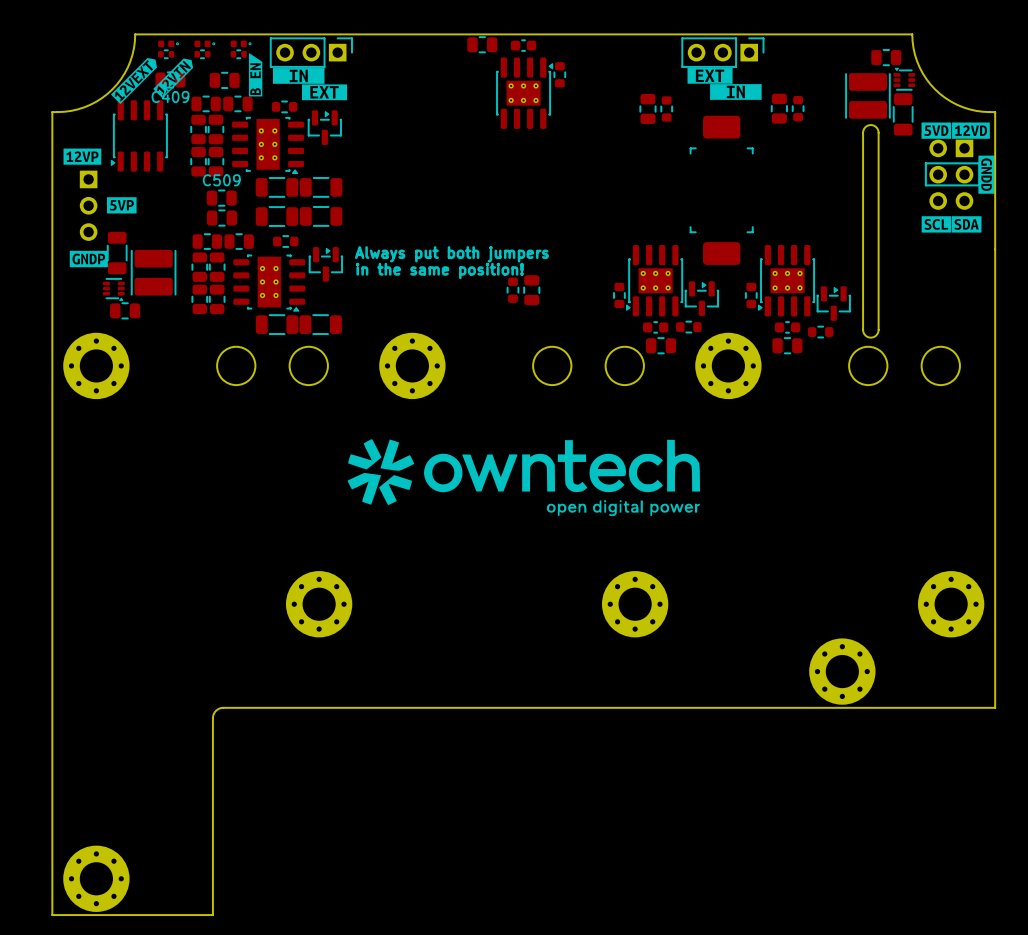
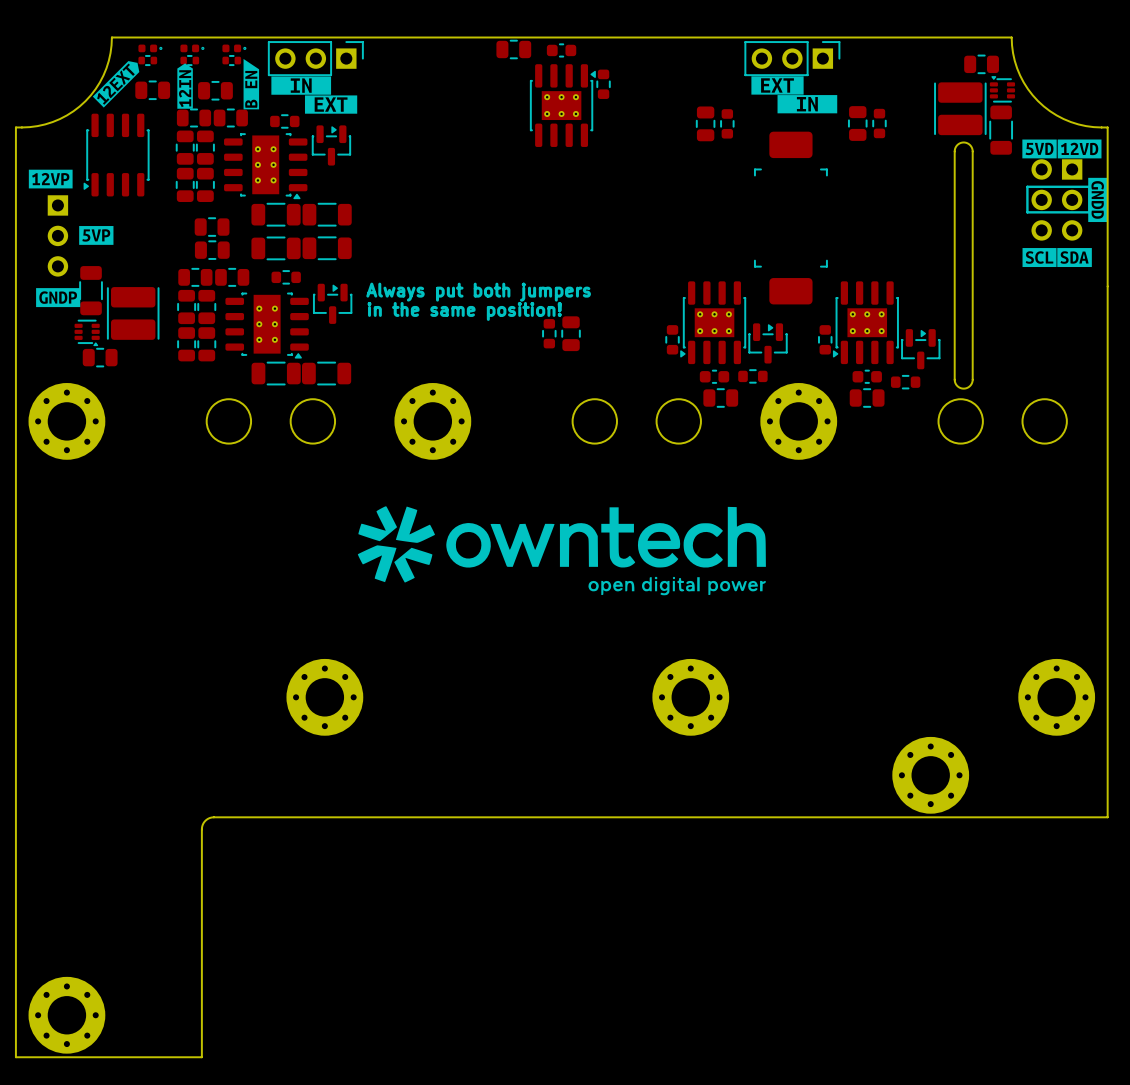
drawing: none -> [177, 63, 193, 109]
drawing shape: [110, 57, 158, 105] -> [92, 61, 140, 108]
drawing: [153, 58, 194, 99] -> none
C409 name: C409 (170, 96) -> none
C509 name: C509 (221, 180) -> none

